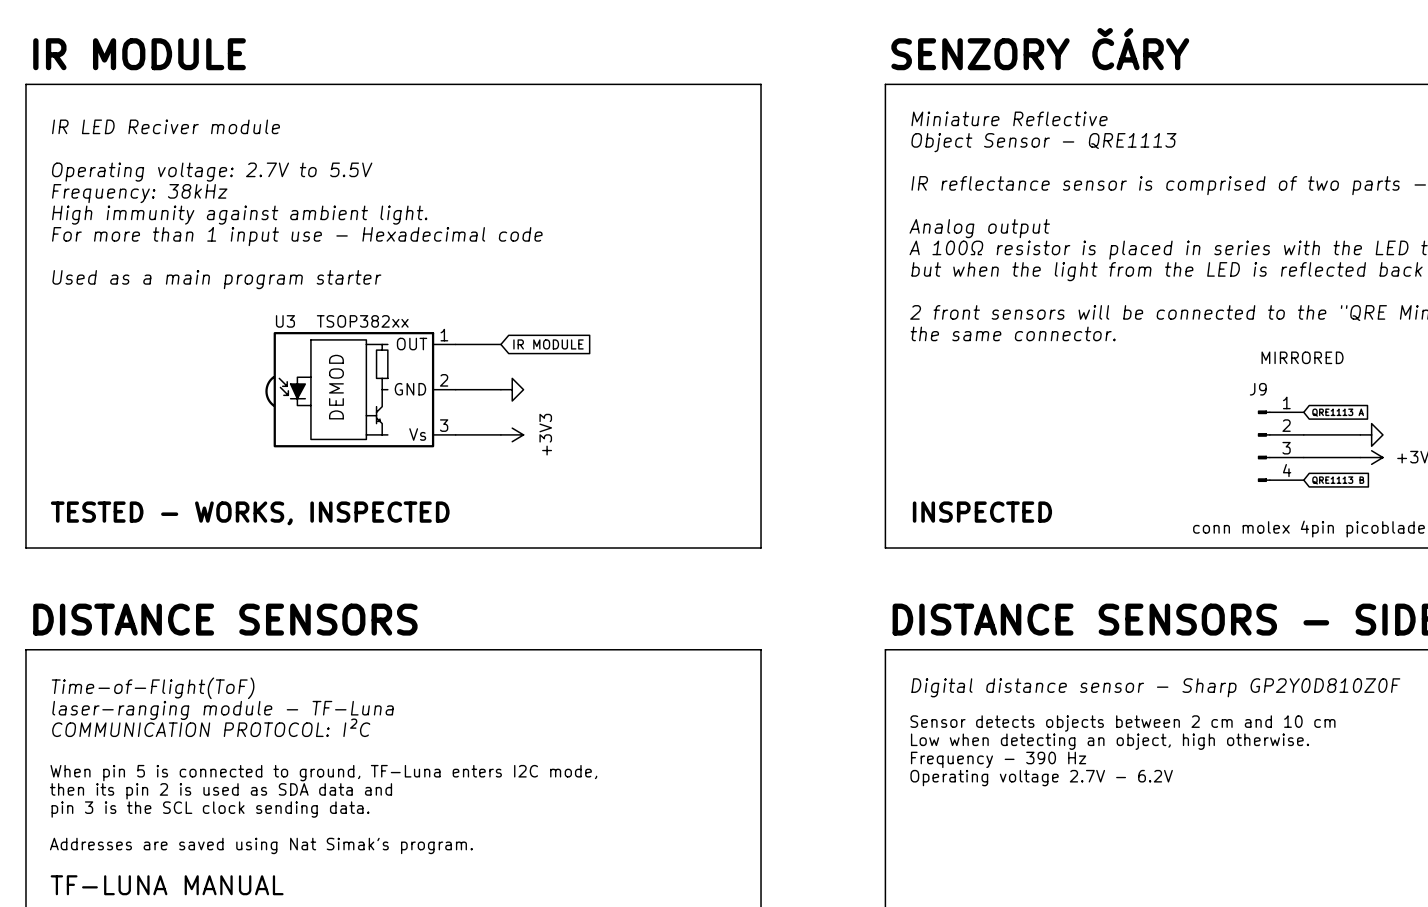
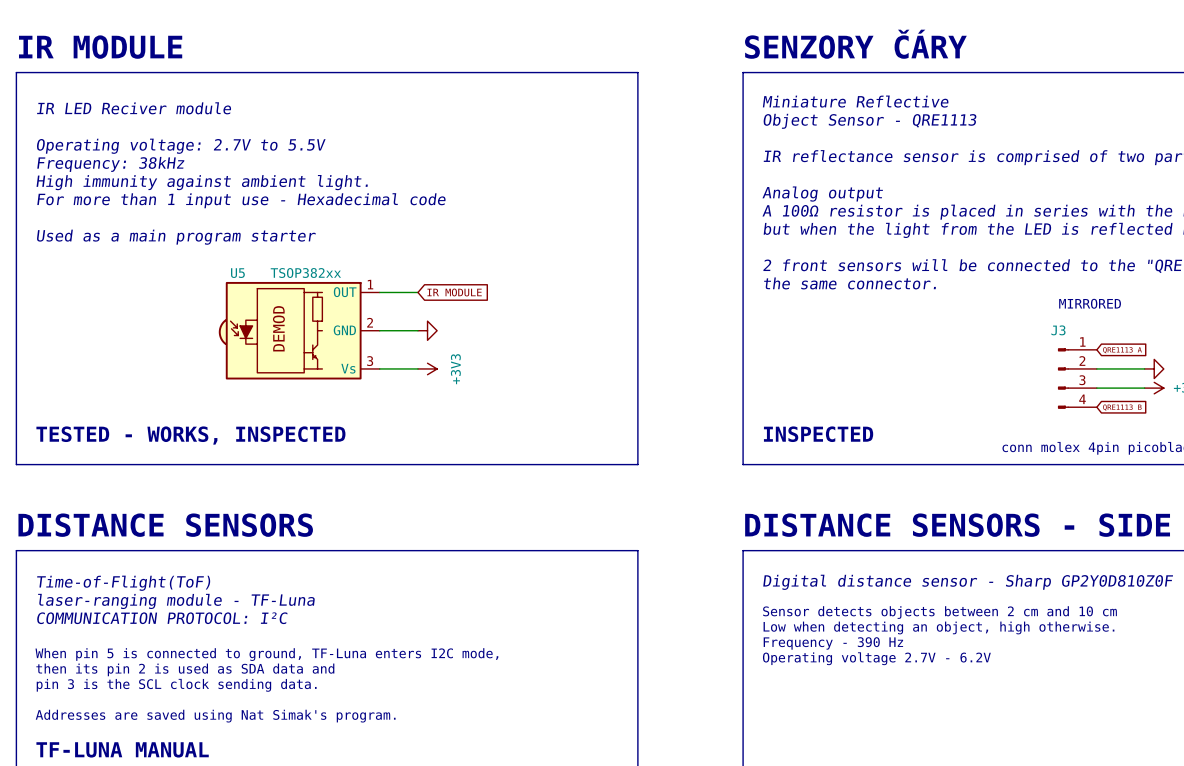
U3 name: U3 (285, 321) -> U5 (237, 273)
J9 name: J9 (1258, 389) -> J3 (1058, 330)

